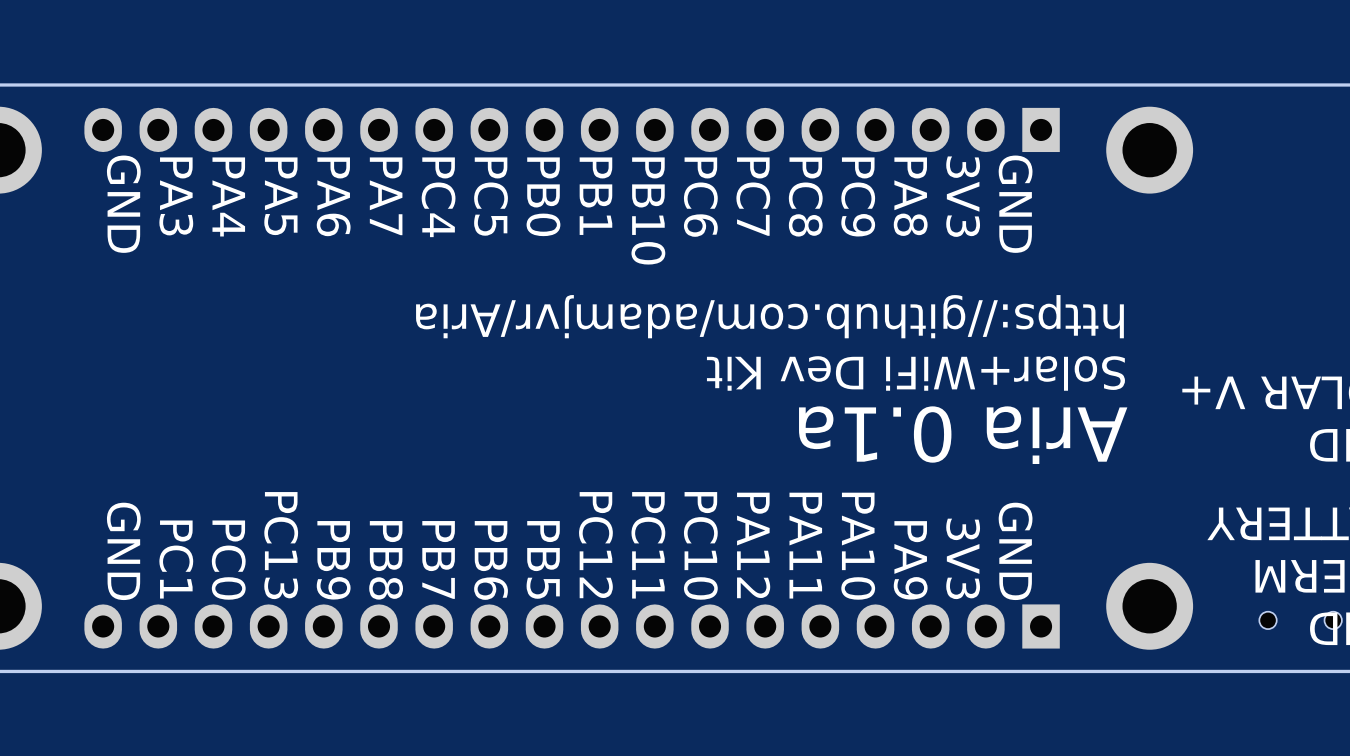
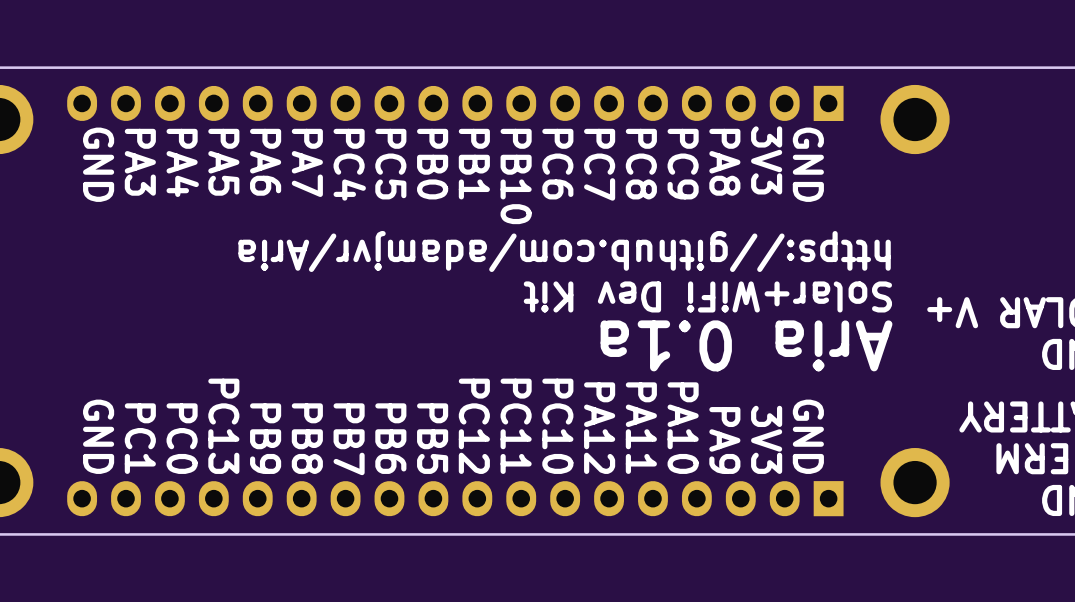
part: (1300, 620) -> none

